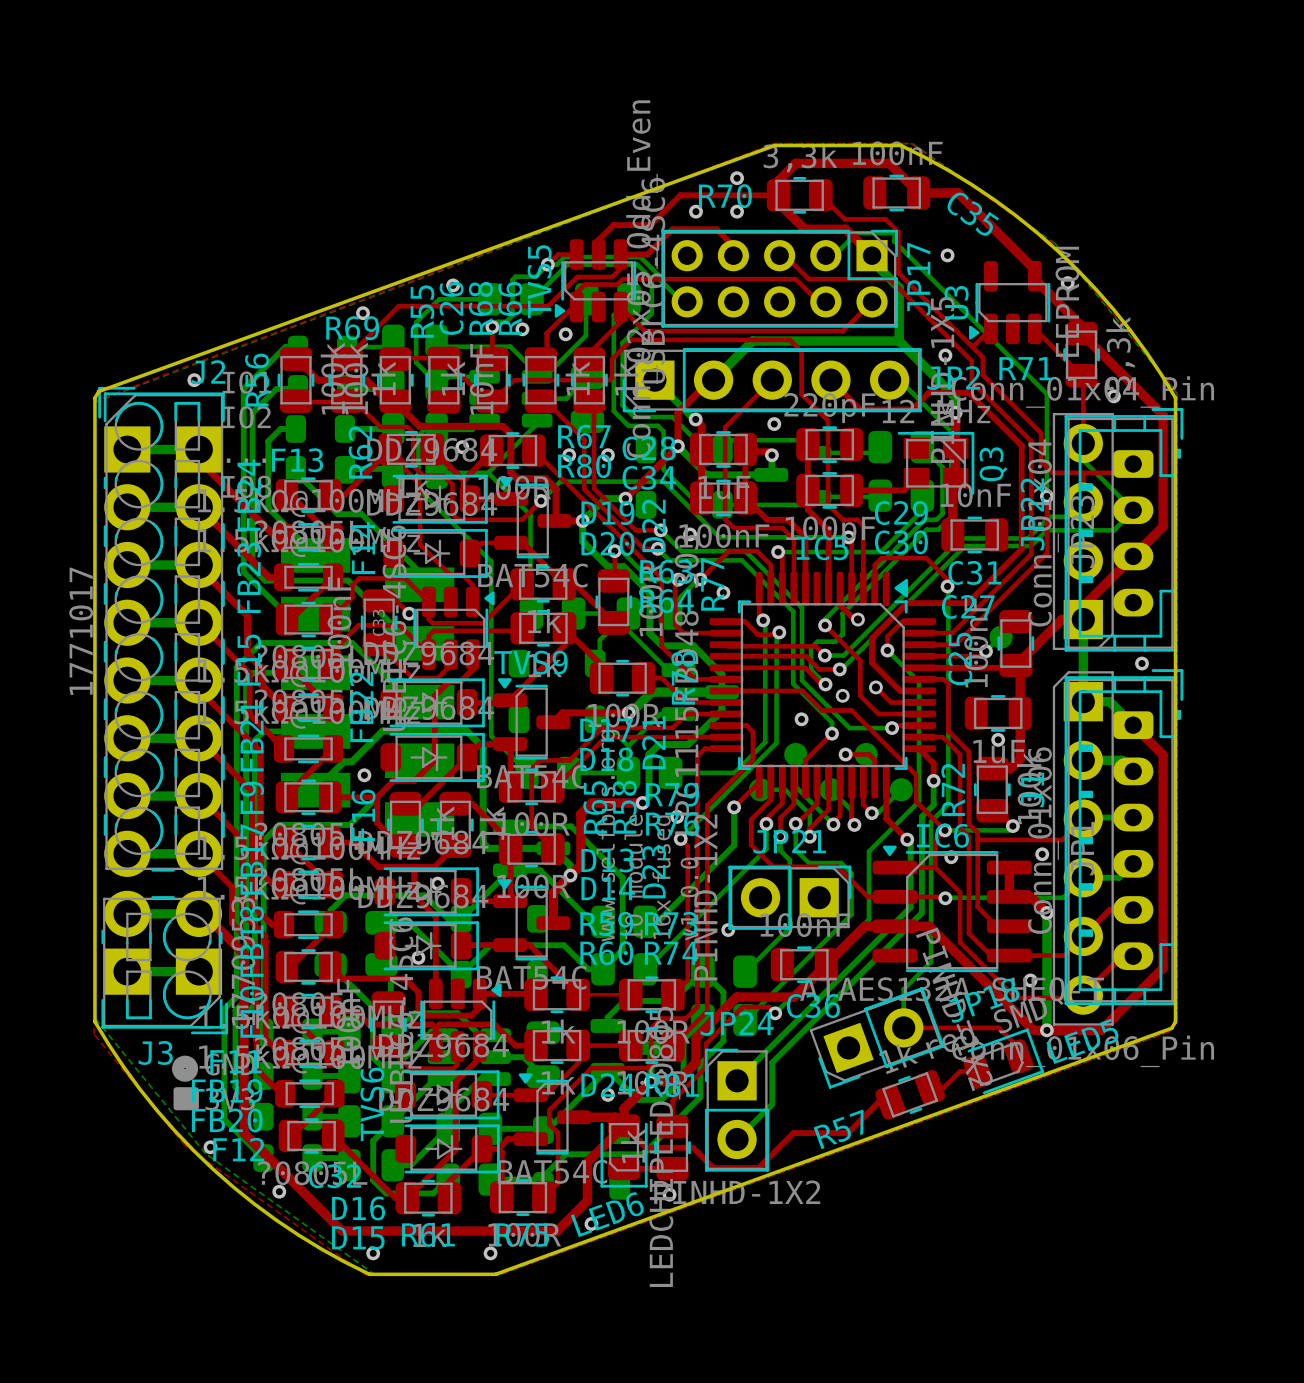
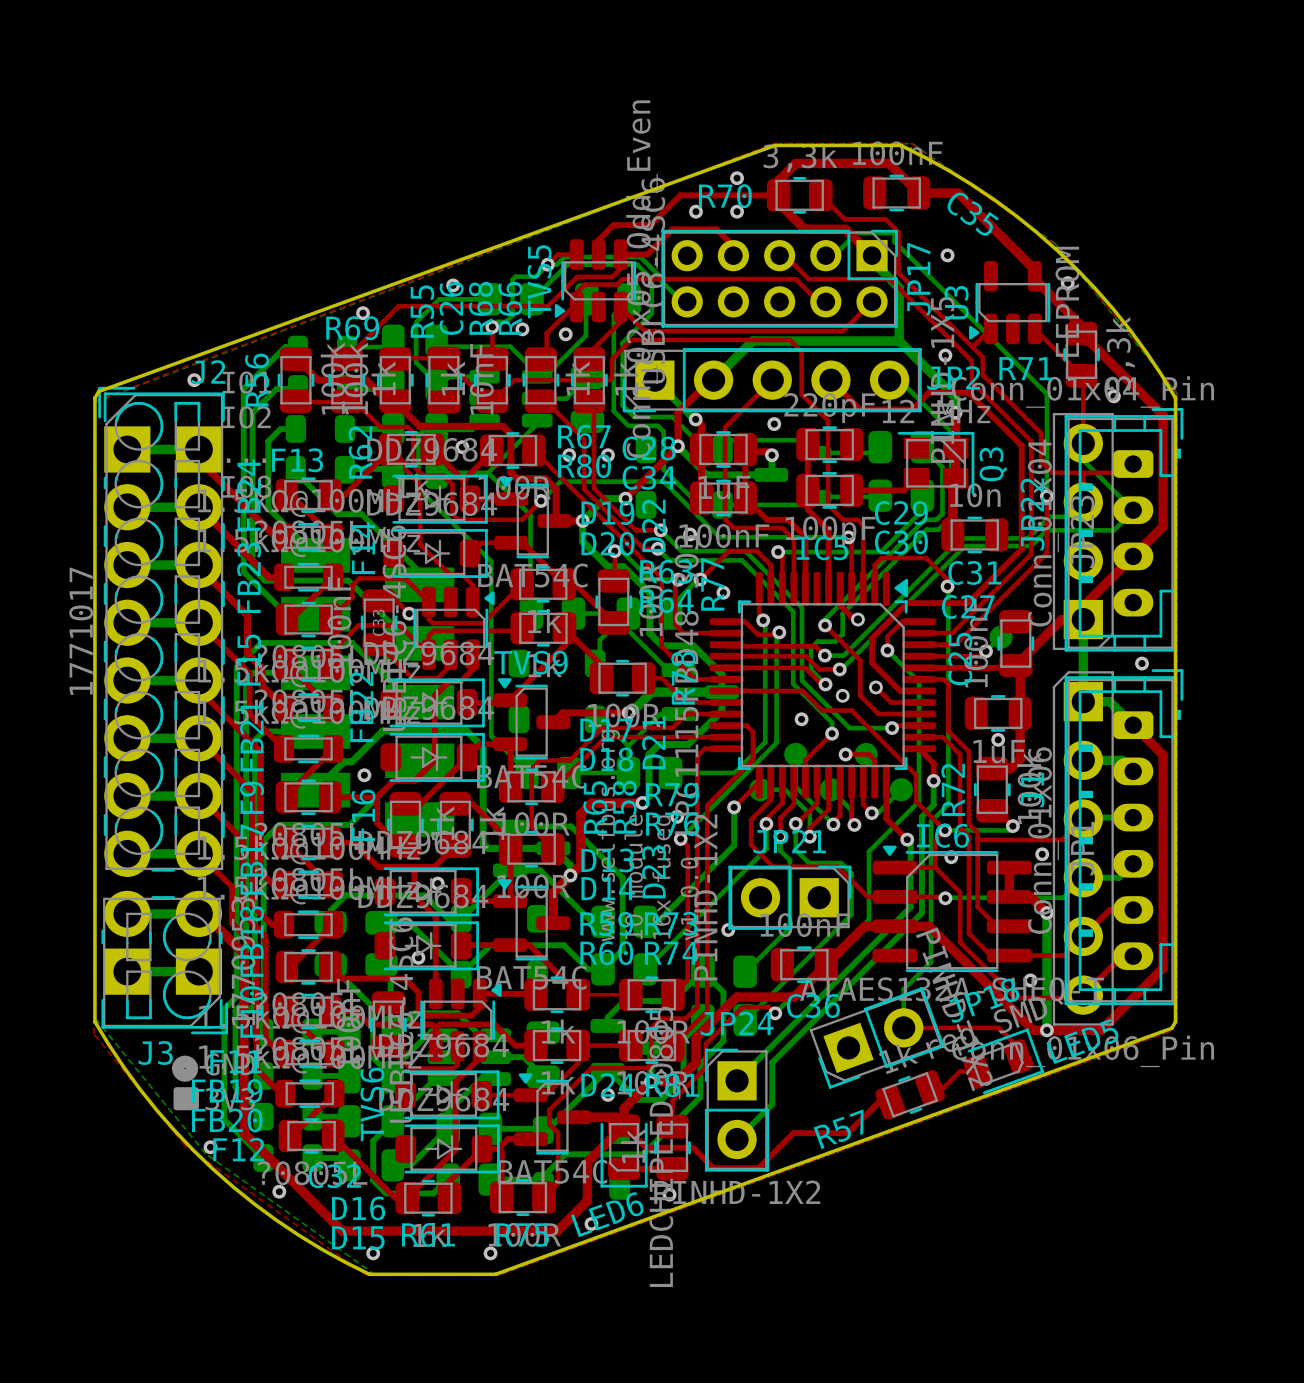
C31 value: 10nF (975, 495) -> 10n (975, 495)

